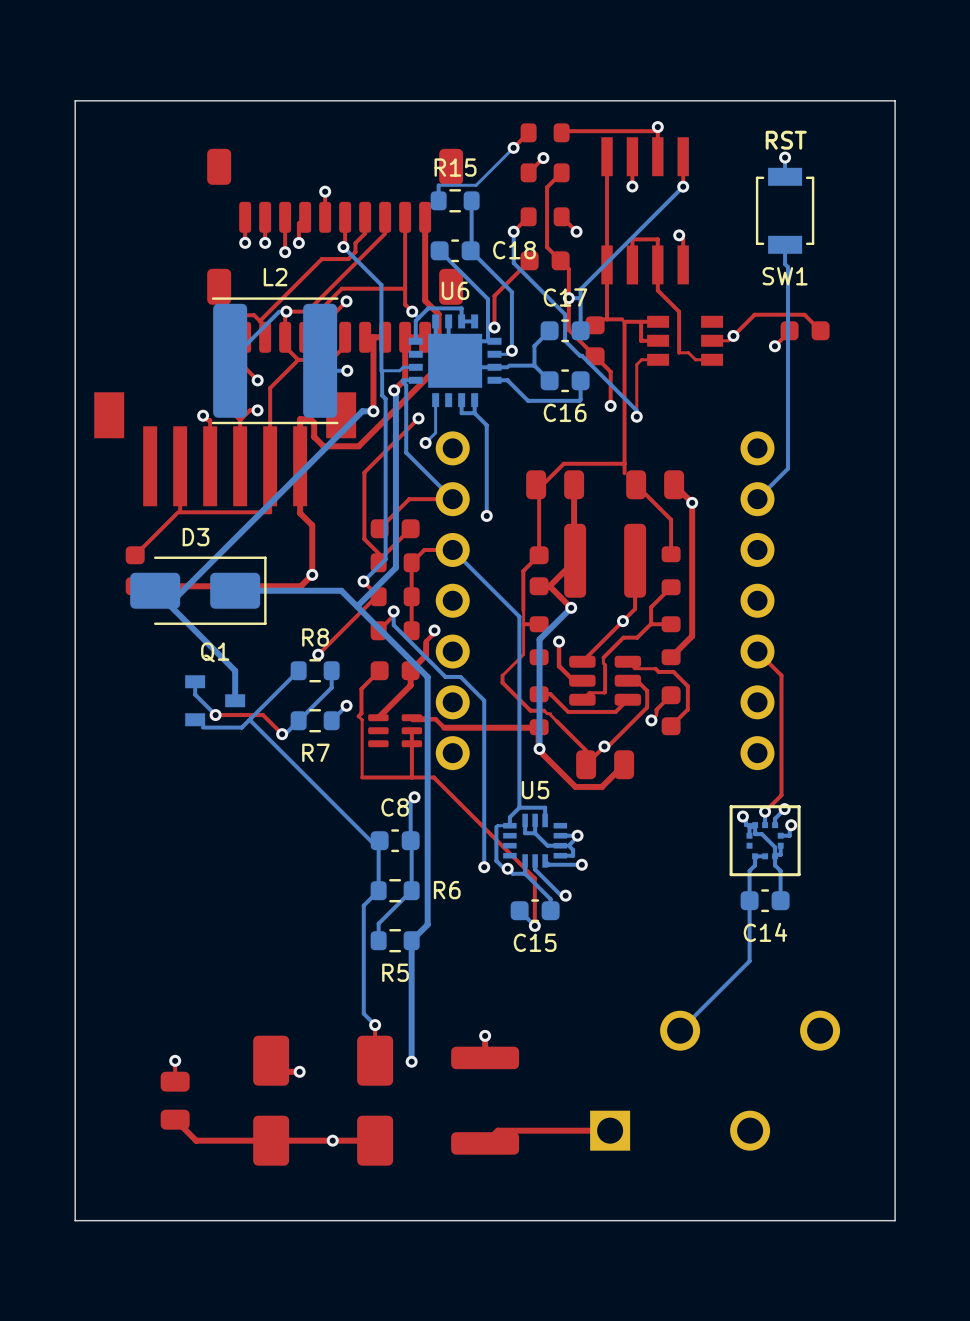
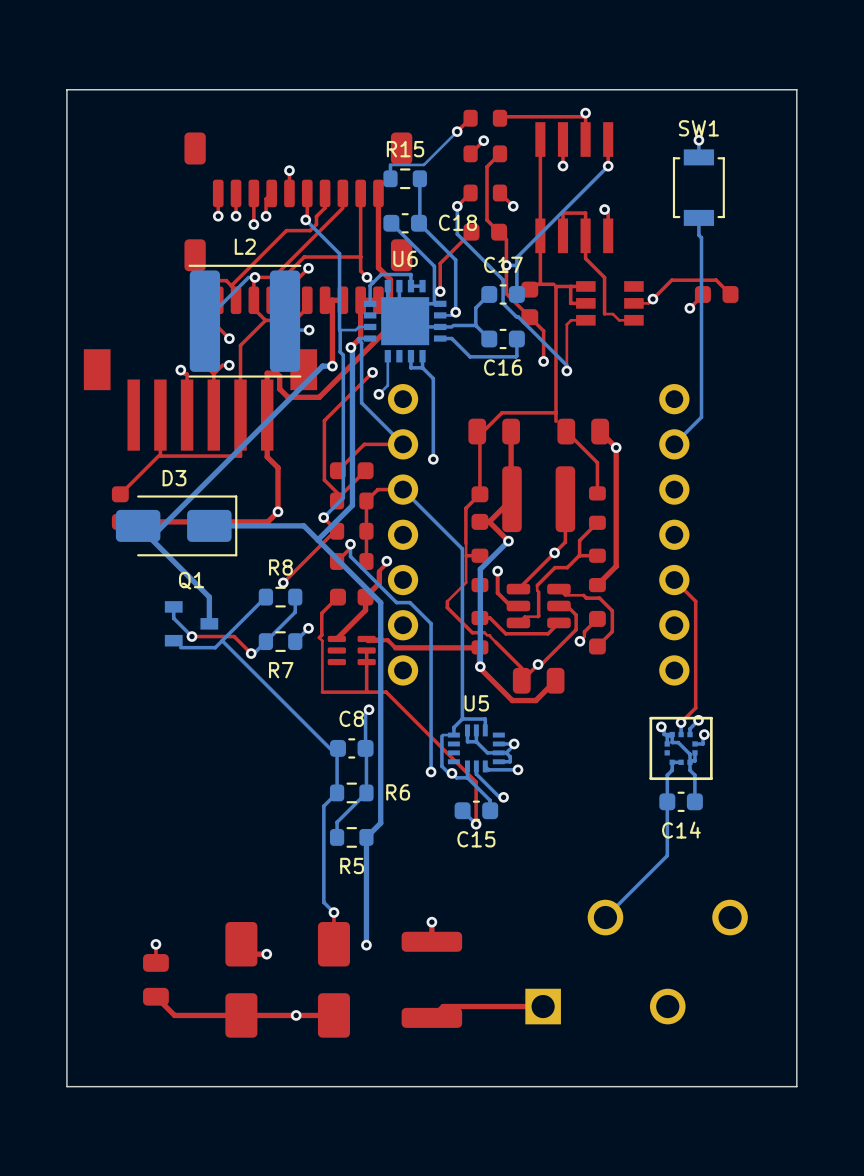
text: RST (786, 140) -> none
SW1 name position: SW1 (785, 276) -> SW1 (698, 128)

